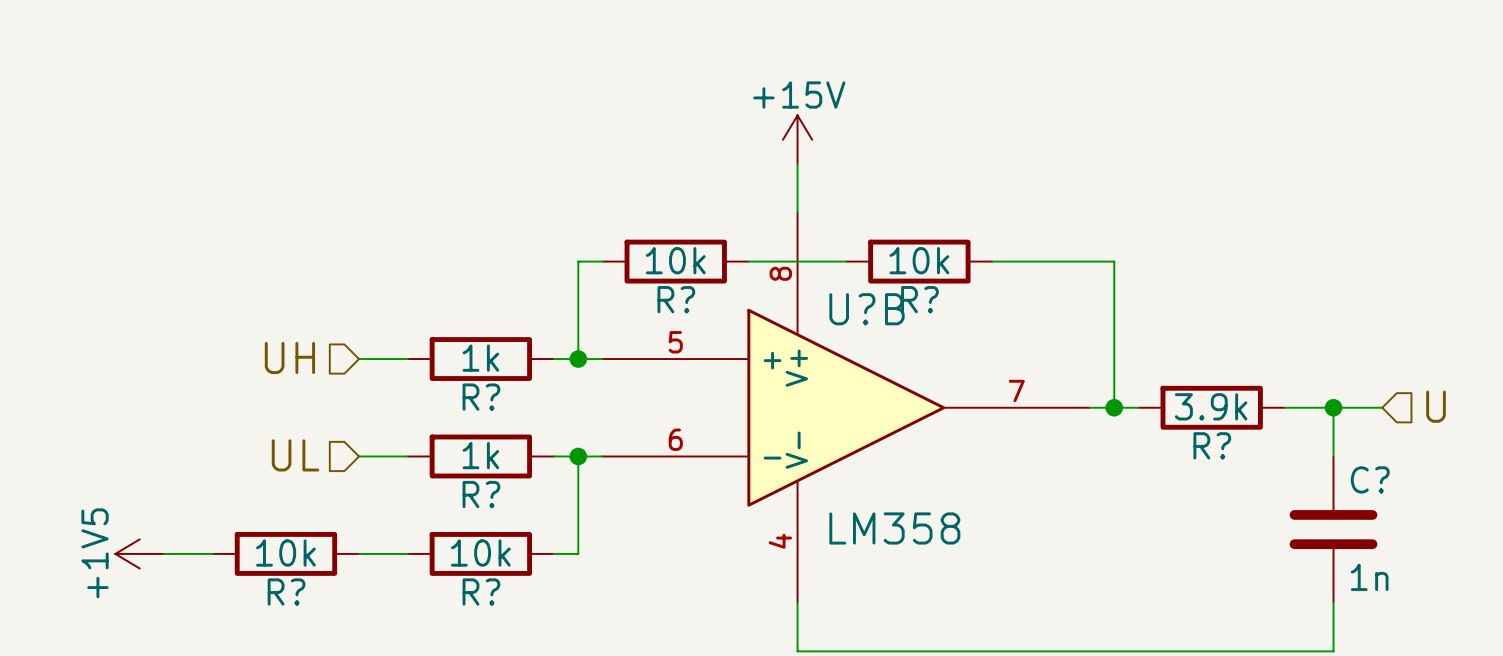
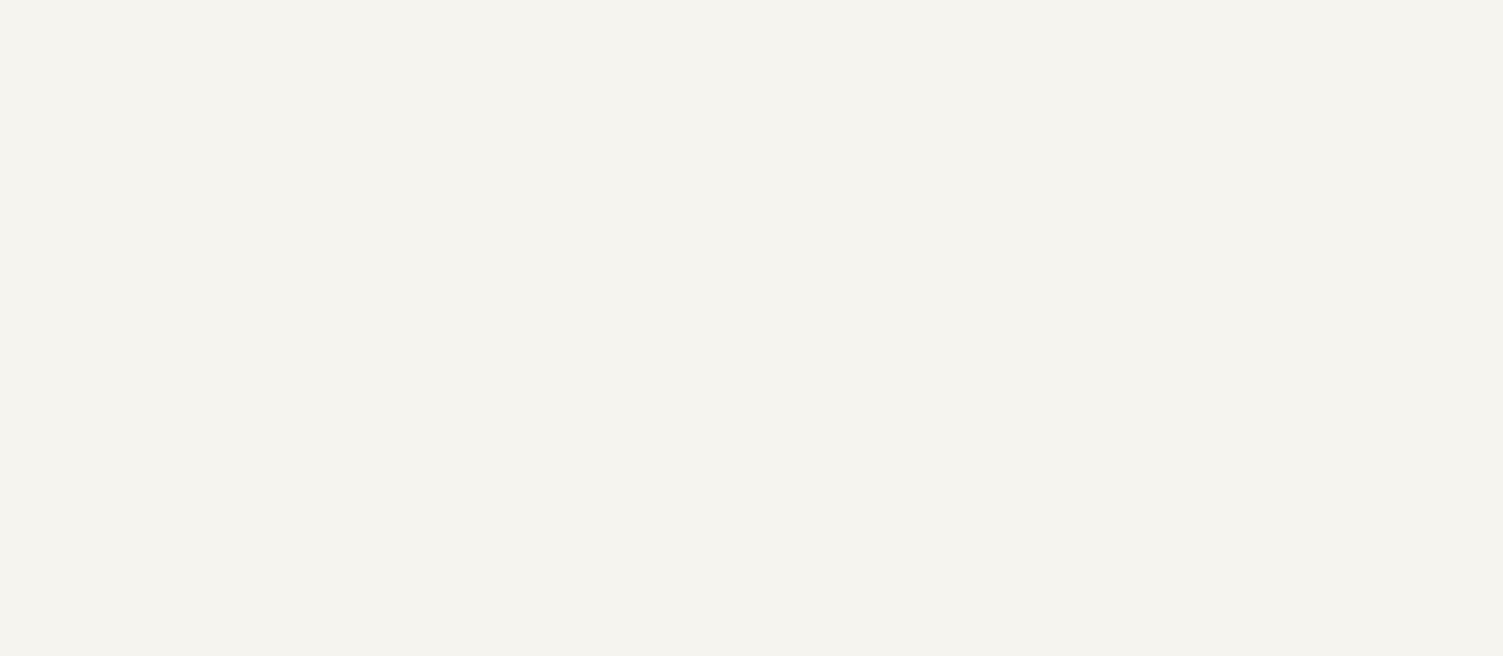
power symbol: +15V (797, 139) -> none
wire: (797, 164) (797, 212) -> none
wire: (602, 261) (578, 261) (578, 359) -> none
R?: 10k (675, 261) -> none
wire: (748, 261) (846, 261) -> none
R?: 10k (919, 261) -> none
wire: (992, 261) (1114, 261) (1114, 407) -> none
hierarchical label: UH (289, 357) -> none
wire: (359, 359) (407, 359) -> none
R?: 1k (480, 359) -> none
wire: (553, 359) (602, 359) -> none
junction: (578, 359) -> none
hierarchical label: U (1436, 406) -> none
U?B: LM358 (846, 407) -> none
wire: (1089, 407) (1138, 407) -> none
junction: (1114, 407) -> none
R?: 3.9k (1211, 407) -> none
wire: (1284, 407) (1382, 407) -> none
wire: (1333, 407) (1333, 456) -> none
junction: (1333, 407) -> none
hierarchical label: UL (295, 455) -> none
wire: (359, 456) (407, 456) -> none
R?: 1k (480, 456) -> none
wire: (553, 456) (602, 456) -> none
wire: (578, 456) (578, 553) (553, 553) -> none
junction: (578, 456) -> none
C?: 1n (1333, 529) -> none
power symbol: +1V5 (139, 553) -> none
wire: (164, 553) (212, 553) -> none
R?: 10k (285, 553) -> none
wire: (359, 553) (407, 553) -> none
R?: 10k (480, 553) -> none
wire: (797, 602) (797, 651) (1333, 651) (1333, 602) -> none

